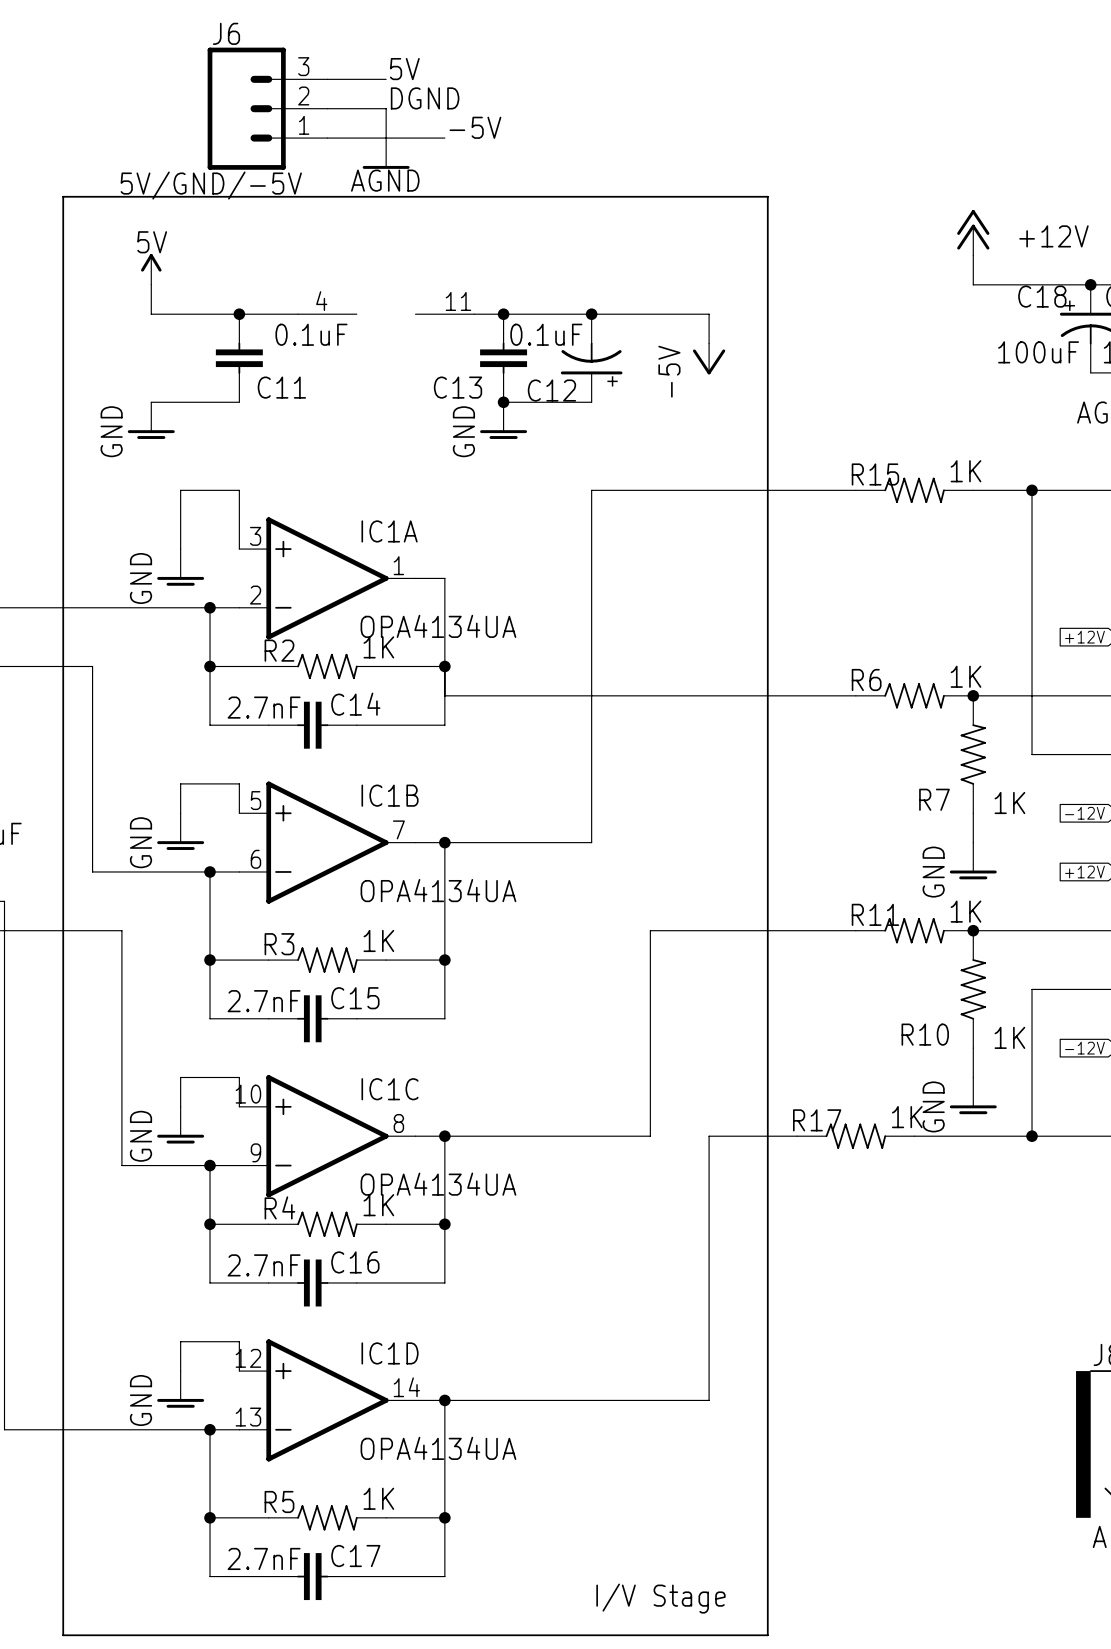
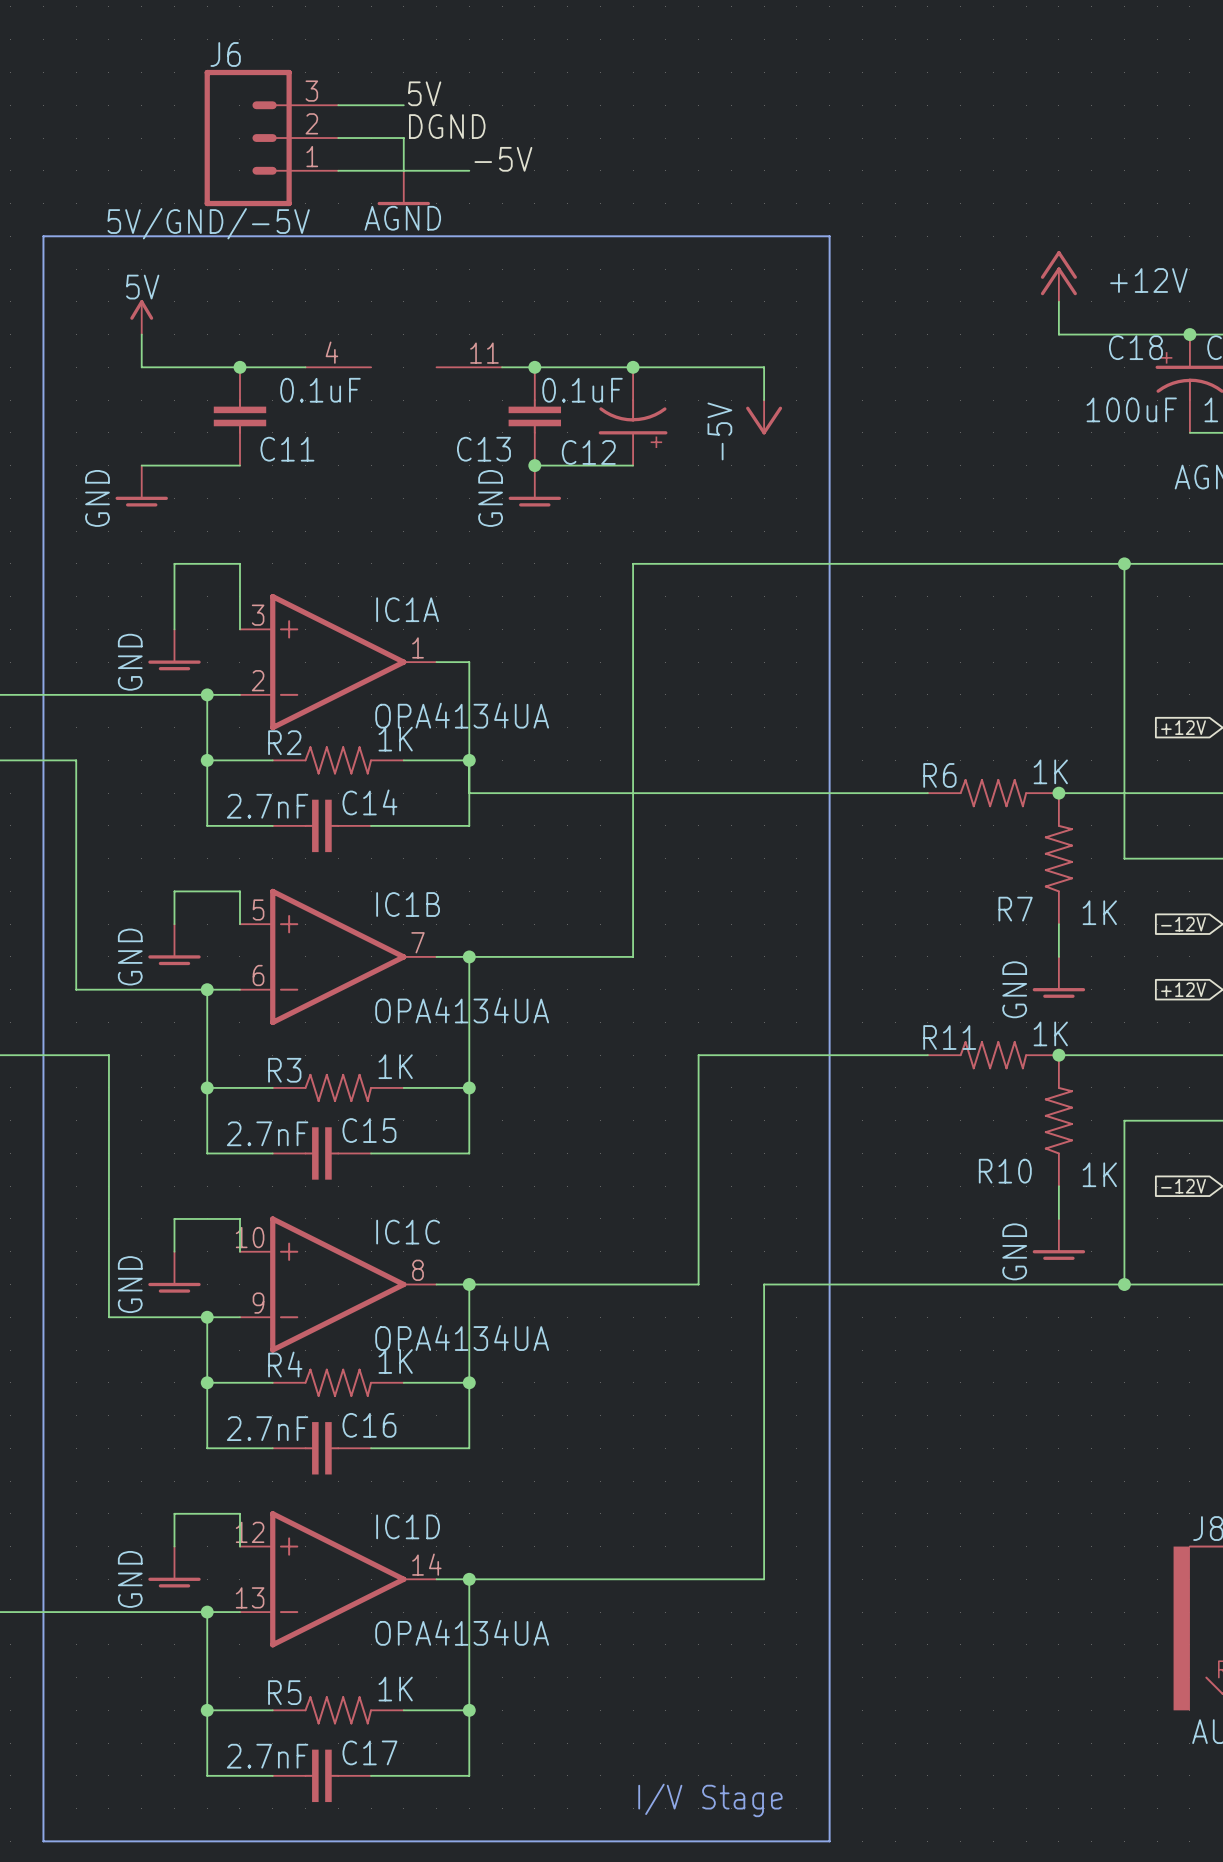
R15: 1K (914, 490) -> none
R17: 1K (855, 1136) -> none

